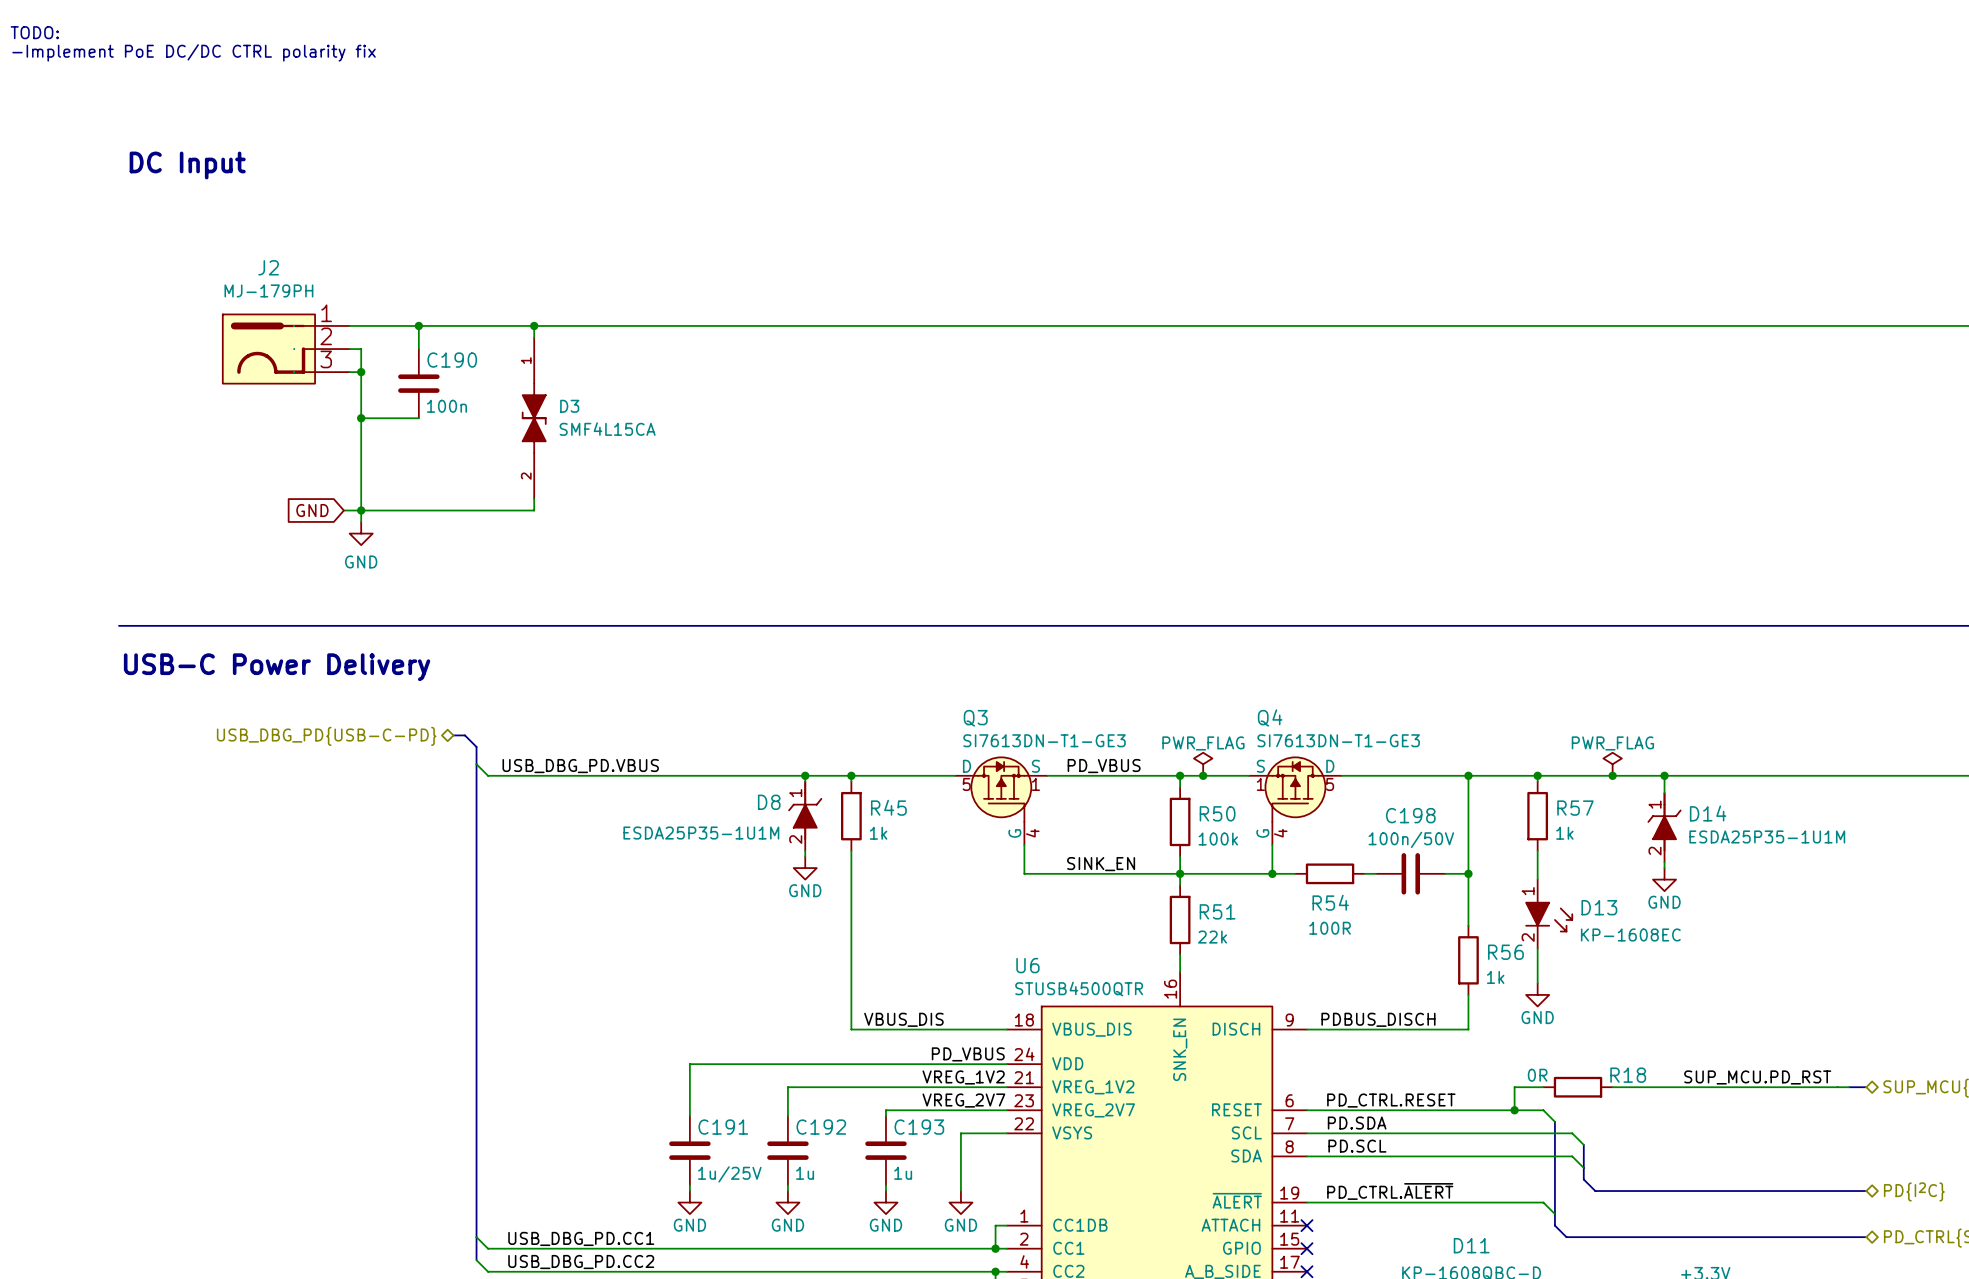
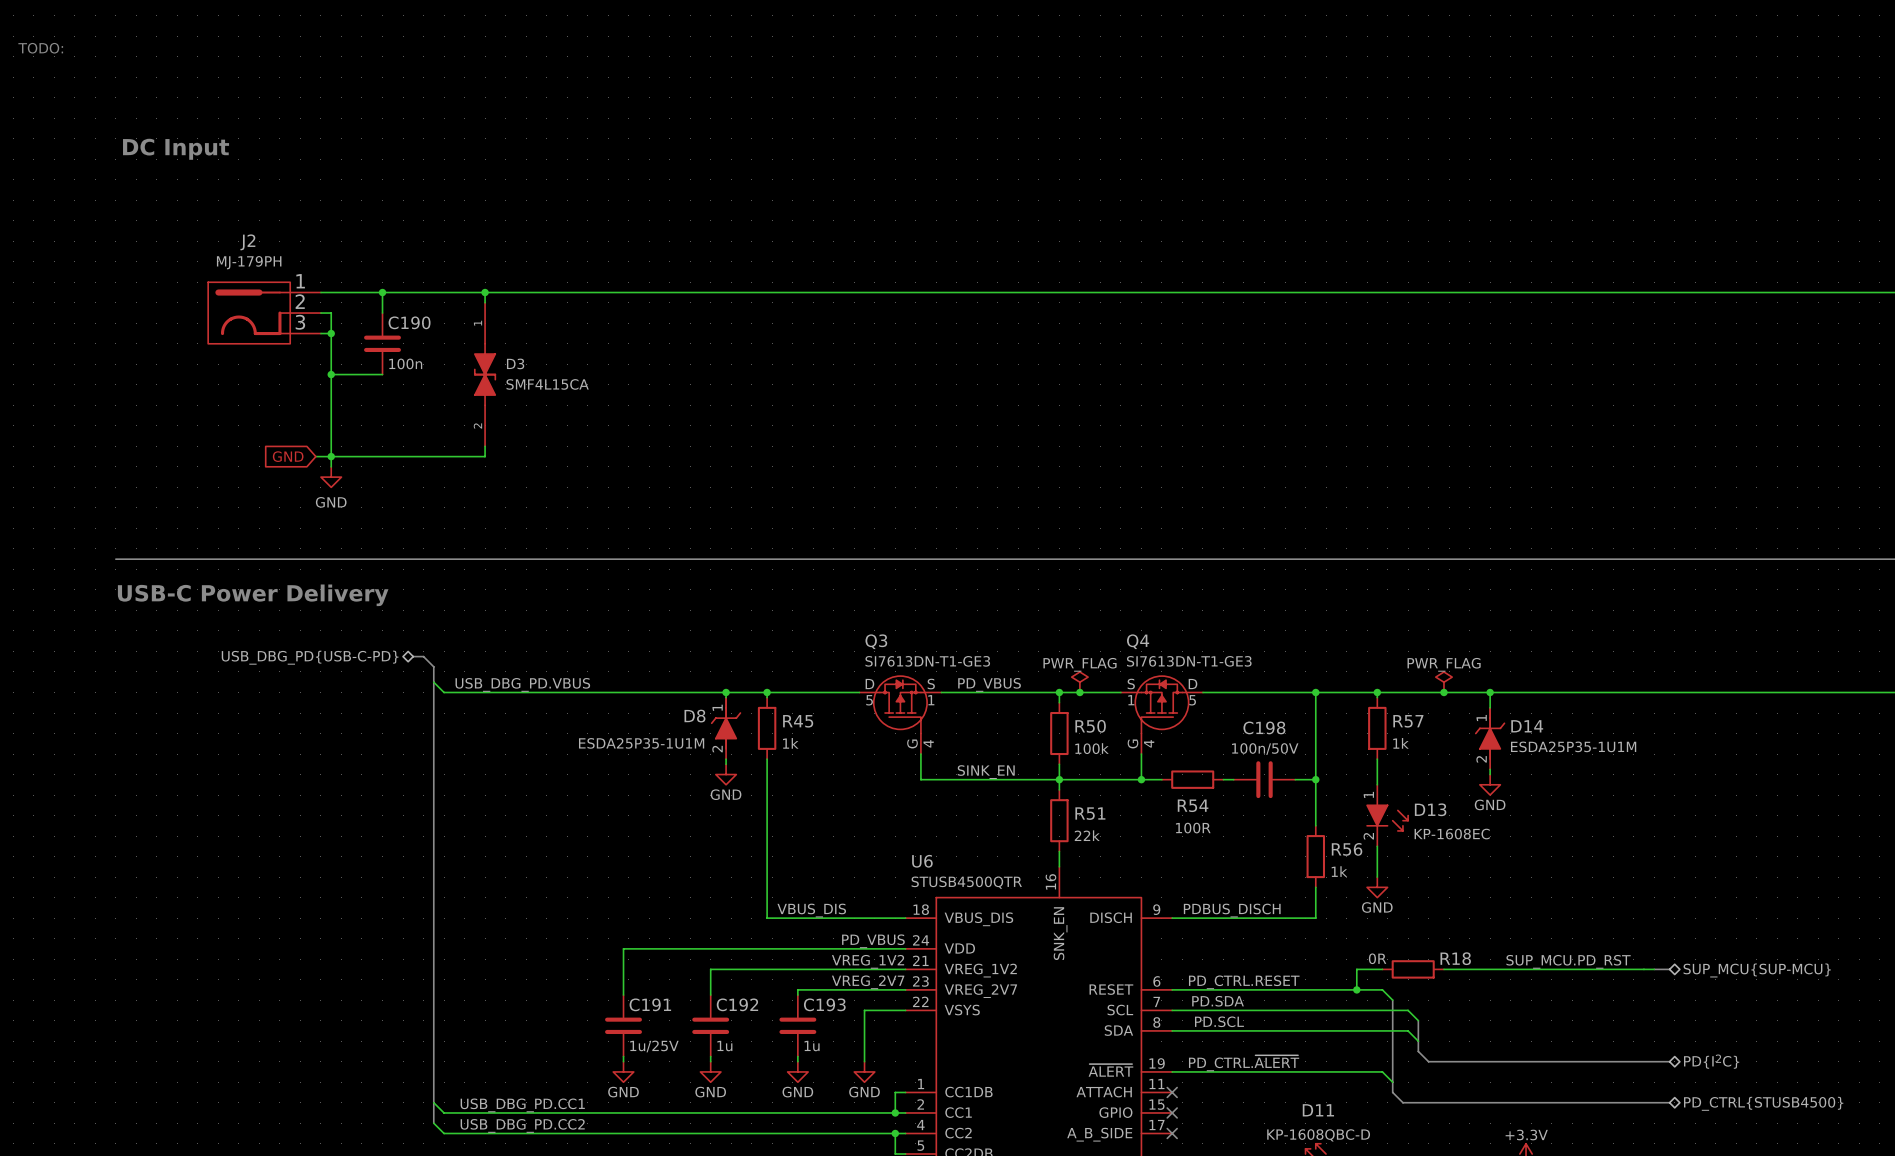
text: TODO: (34, 32) -> none
text: -Implement PoE DC/DC CTRL polarity fix (194, 52) -> TODO: (40, 48)

